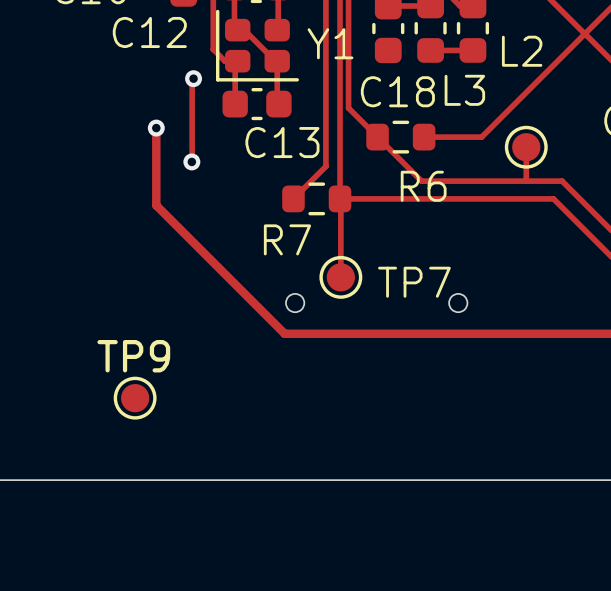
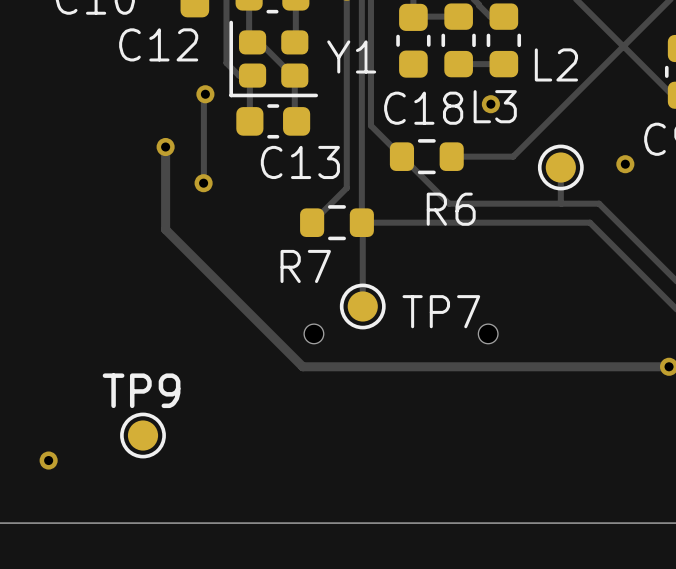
via: none -> (490, 104)
via: none -> (625, 164)
via: none -> (48, 460)

